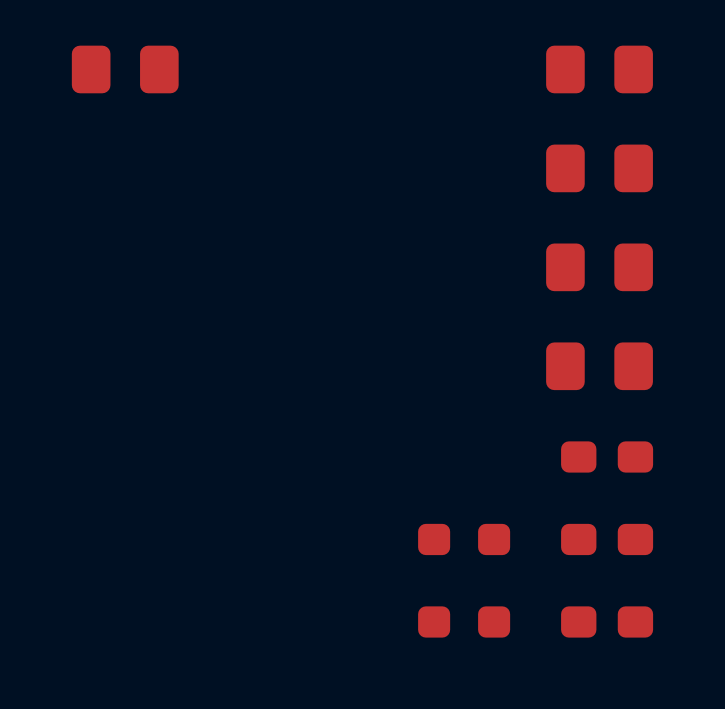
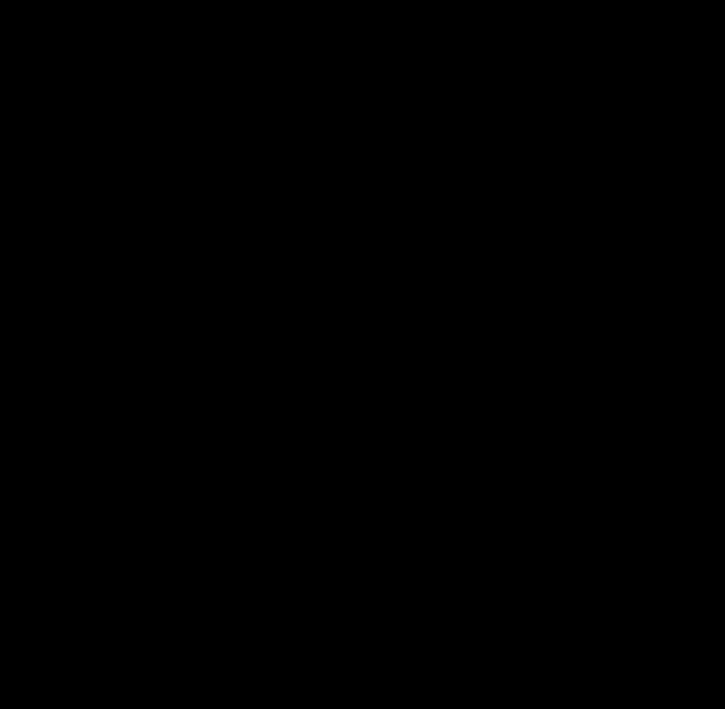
part: (125, 69) -> none
part: (599, 69) -> none
part: (599, 168) -> none
part: (599, 267) -> none
part: (599, 366) -> none
part: (607, 456) -> none
part: (464, 539) -> none
part: (607, 539) -> none
part: (464, 621) -> none
part: (607, 621) -> none

